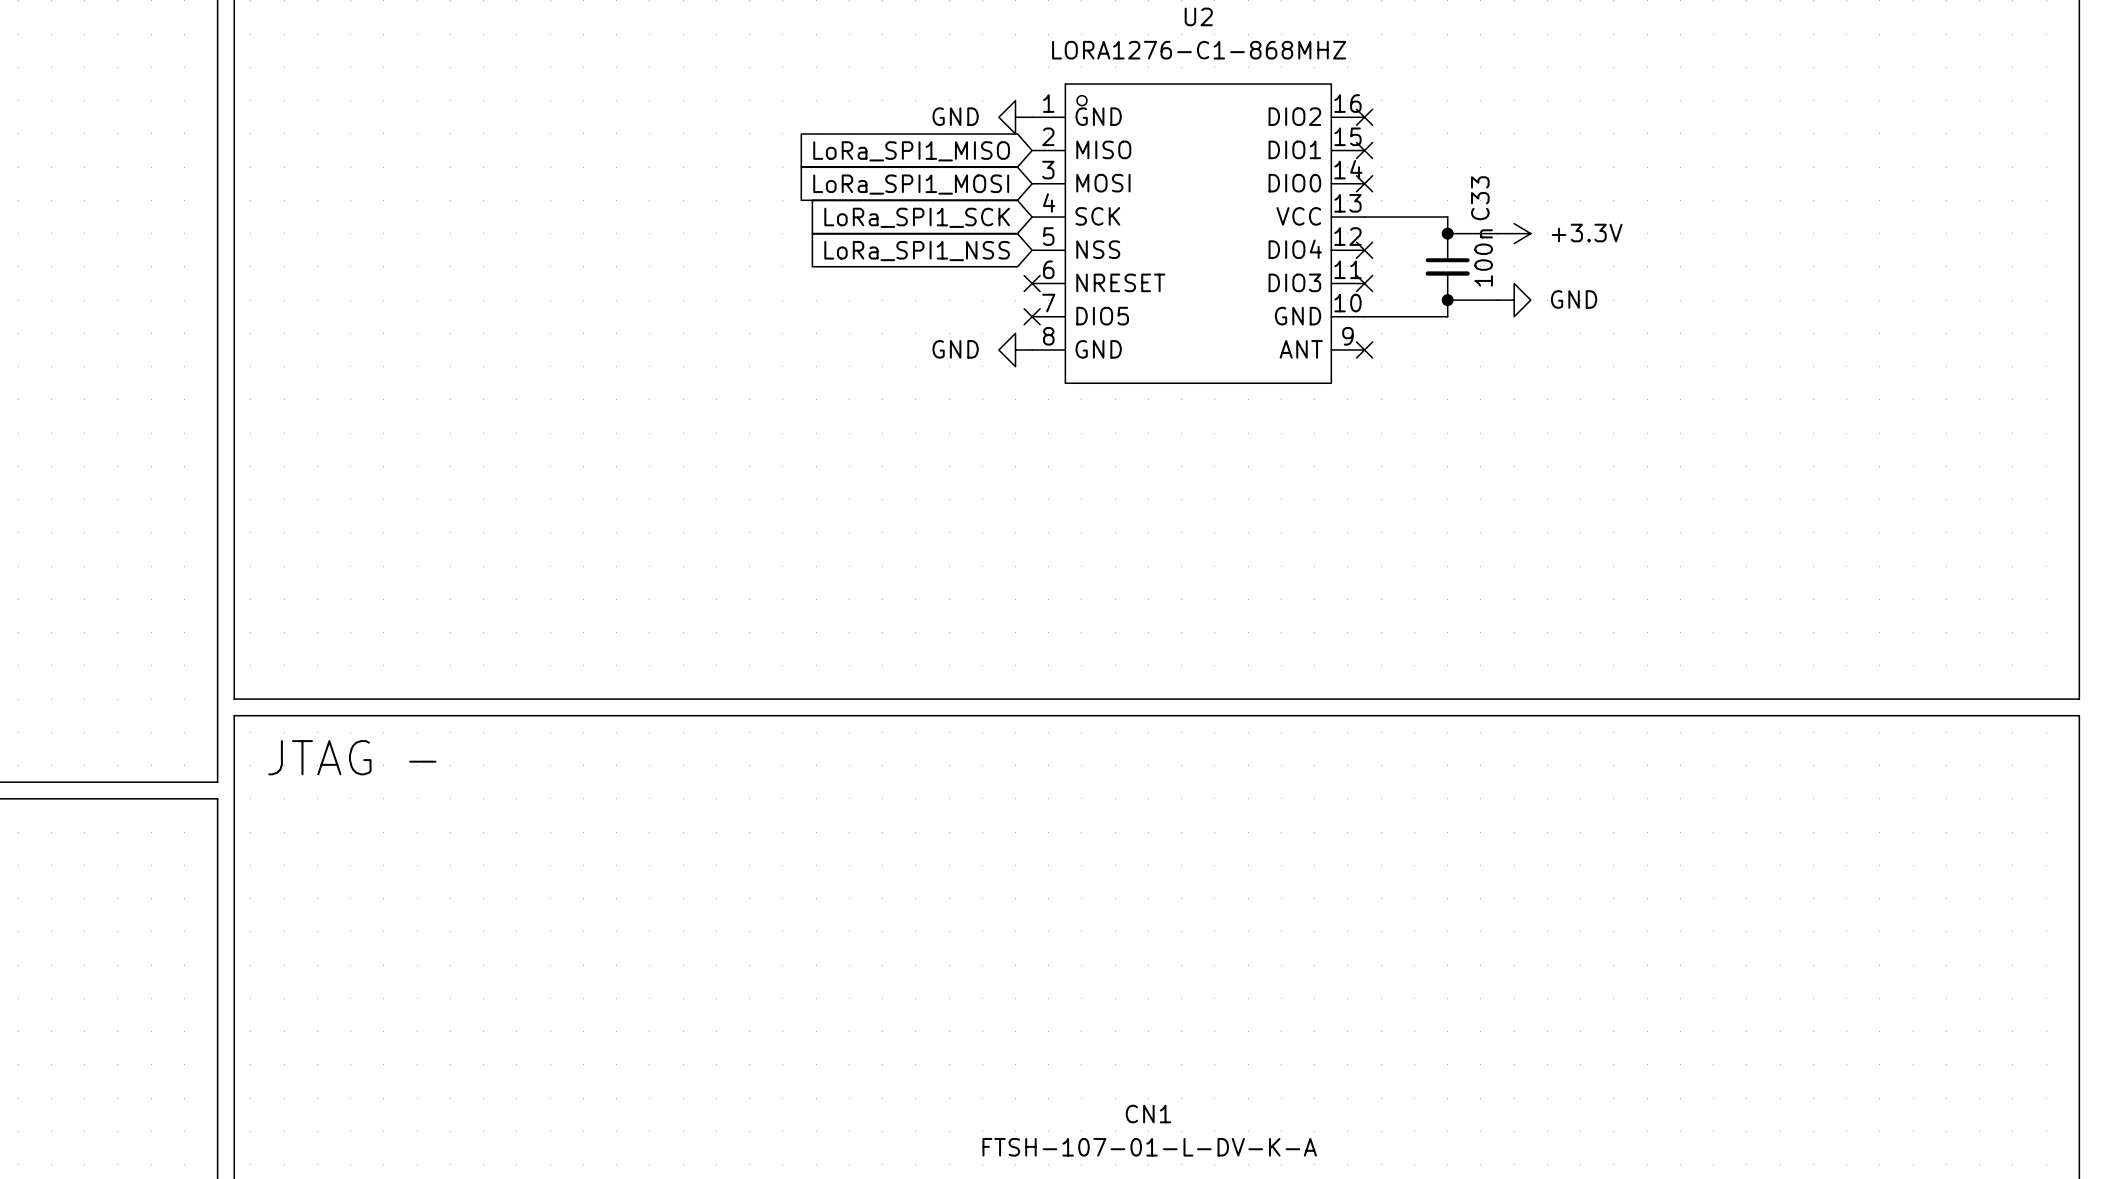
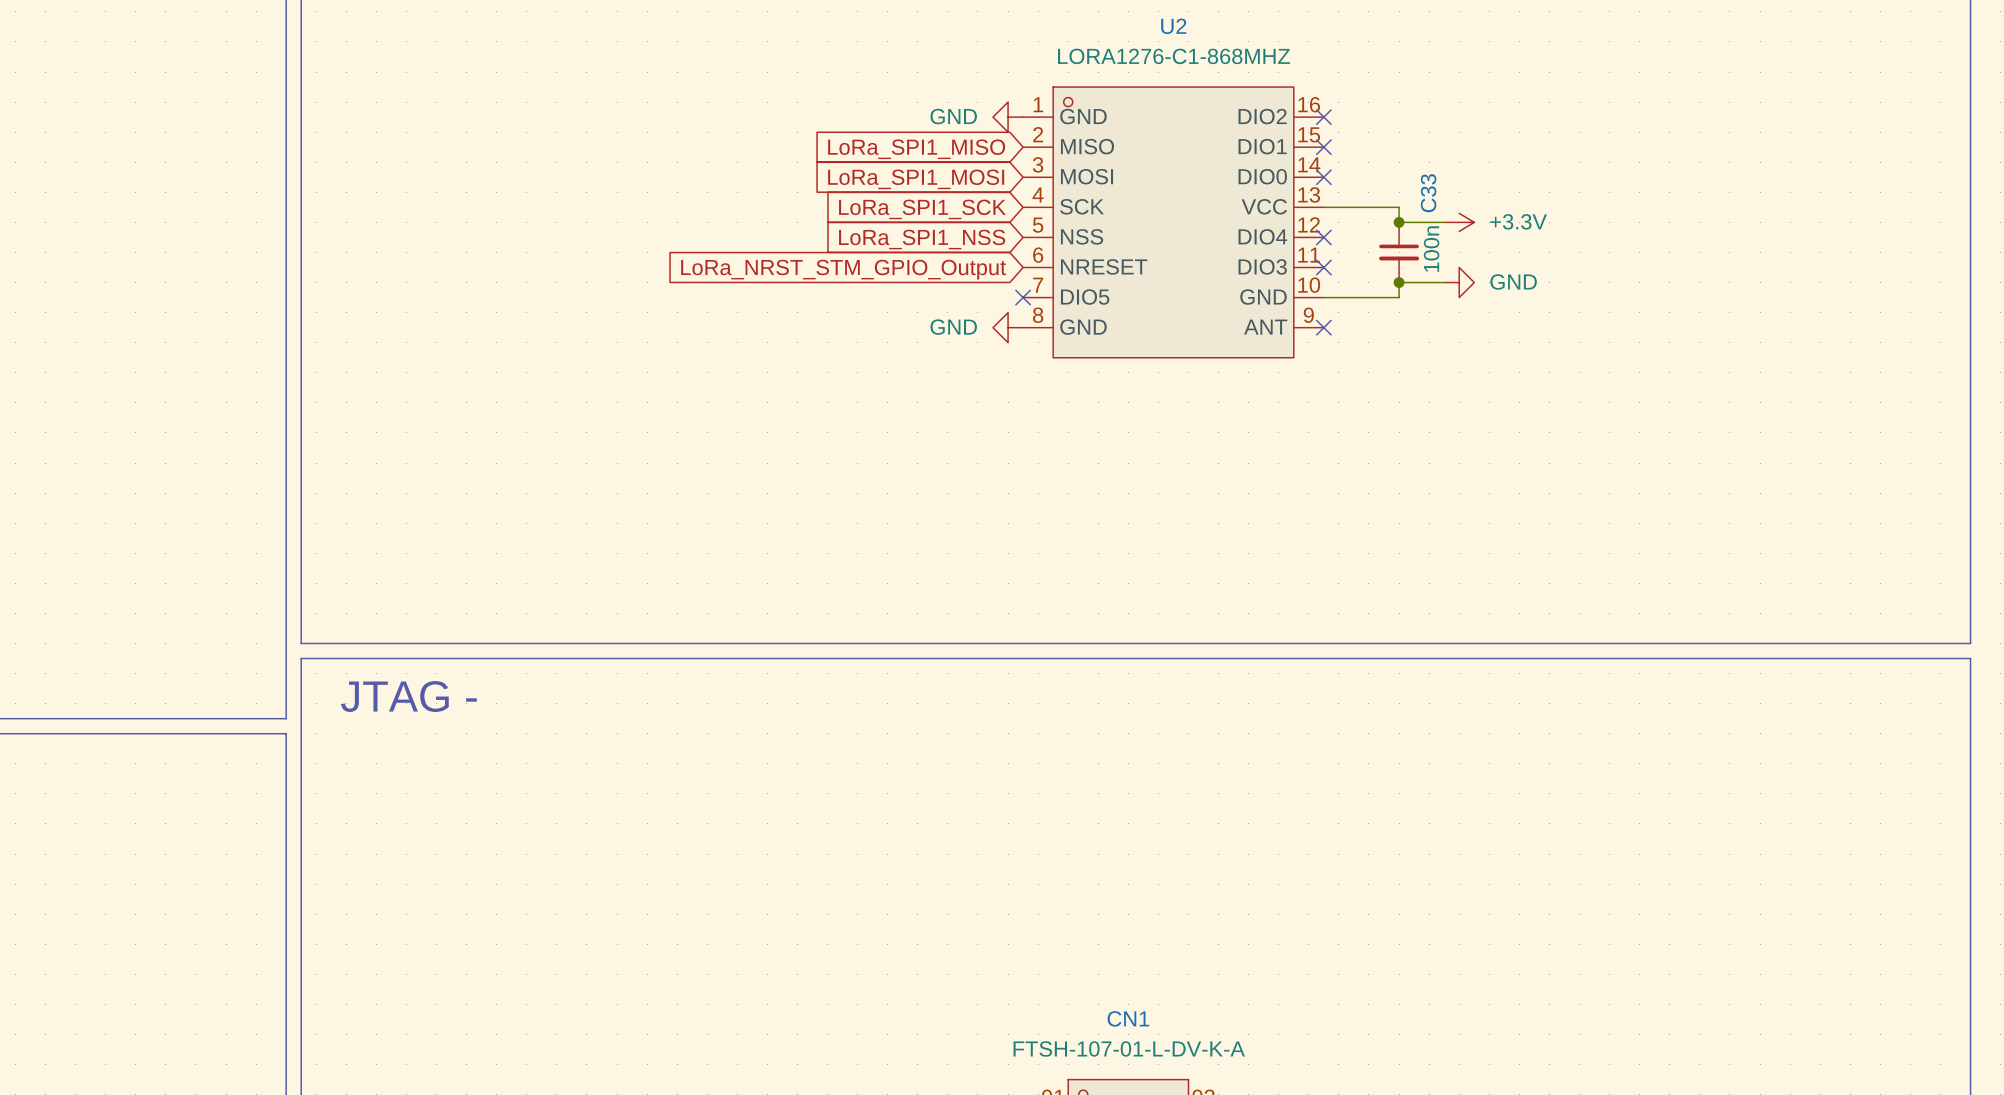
no-connect mark: (1032, 283) -> none
global label: none -> LoRa_NRST_STM_GPIO_Output (843, 269)

